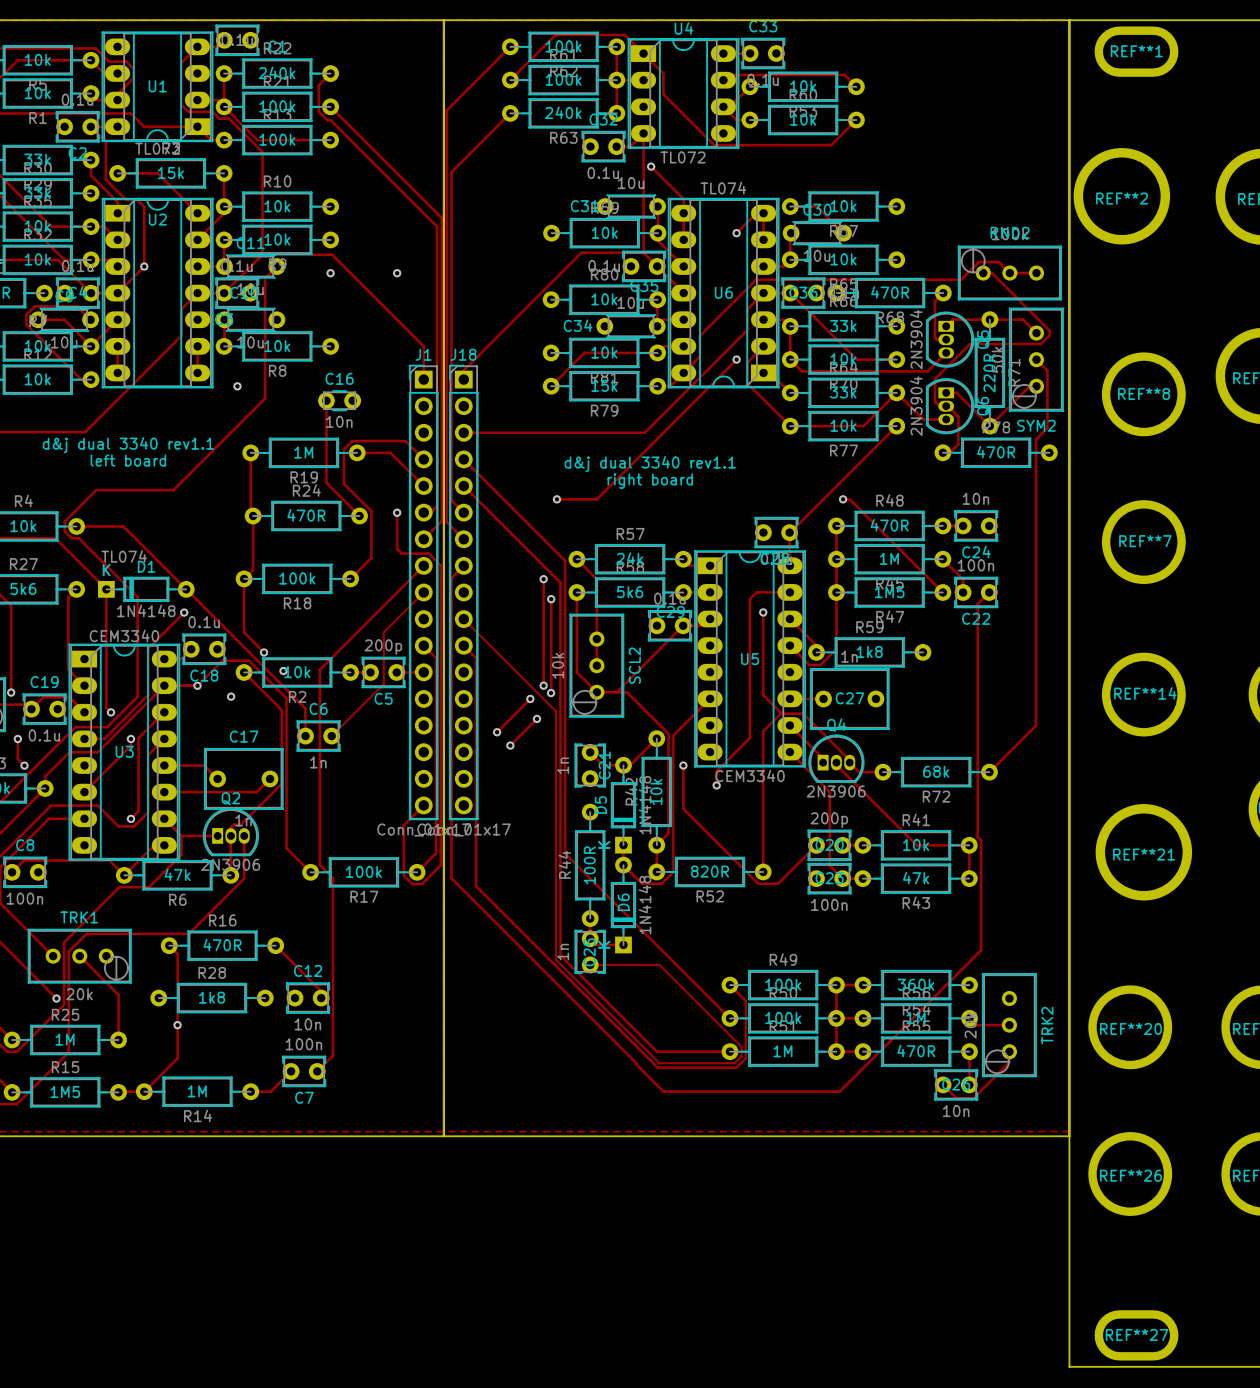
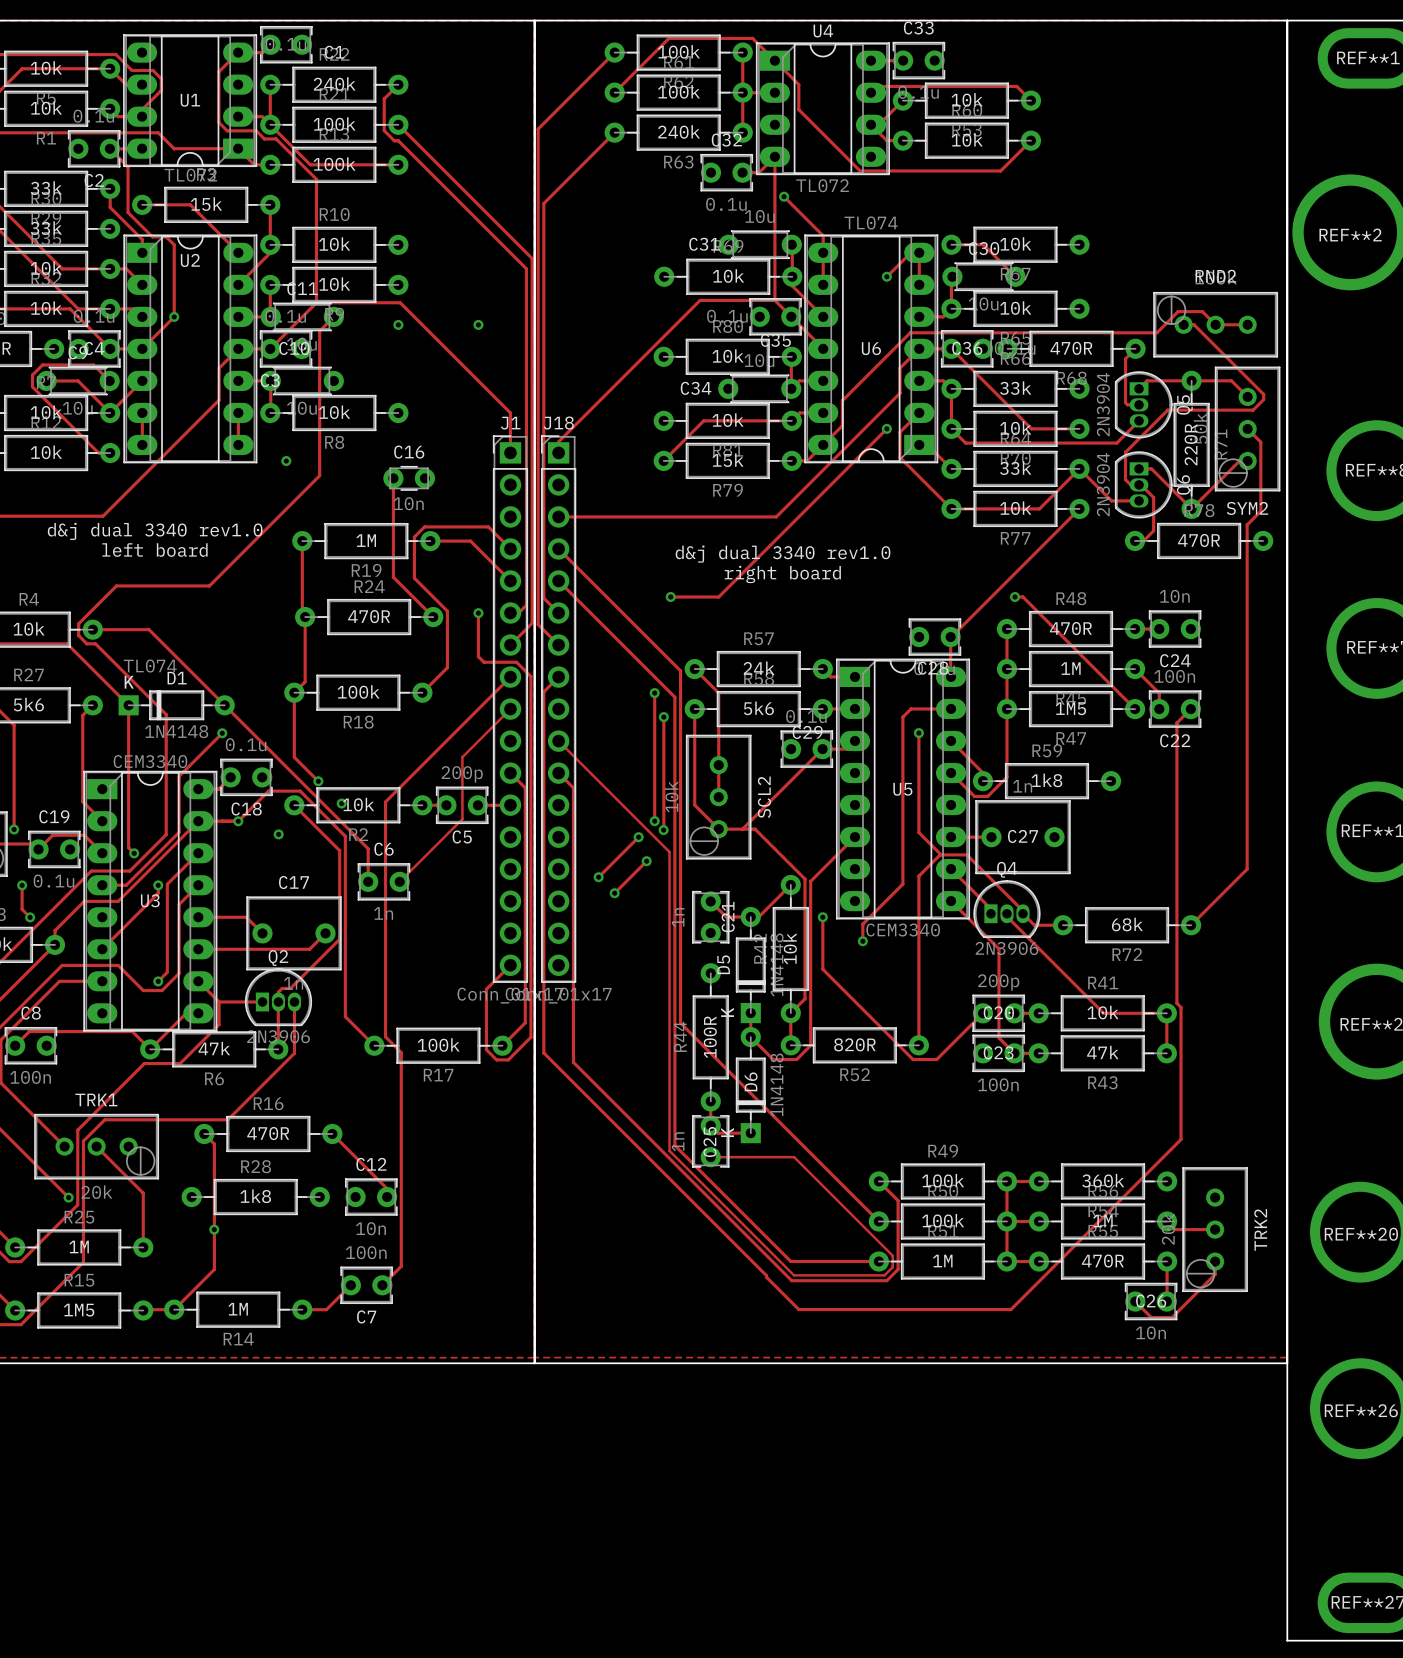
text: d&j dual 3340 rev1.1 (128, 445) -> d&j dual 3340 rev1.0 (155, 531)
text: d&j dual 3340 rev1.1 (650, 464) -> d&j dual 3340 rev1.0 (783, 554)

